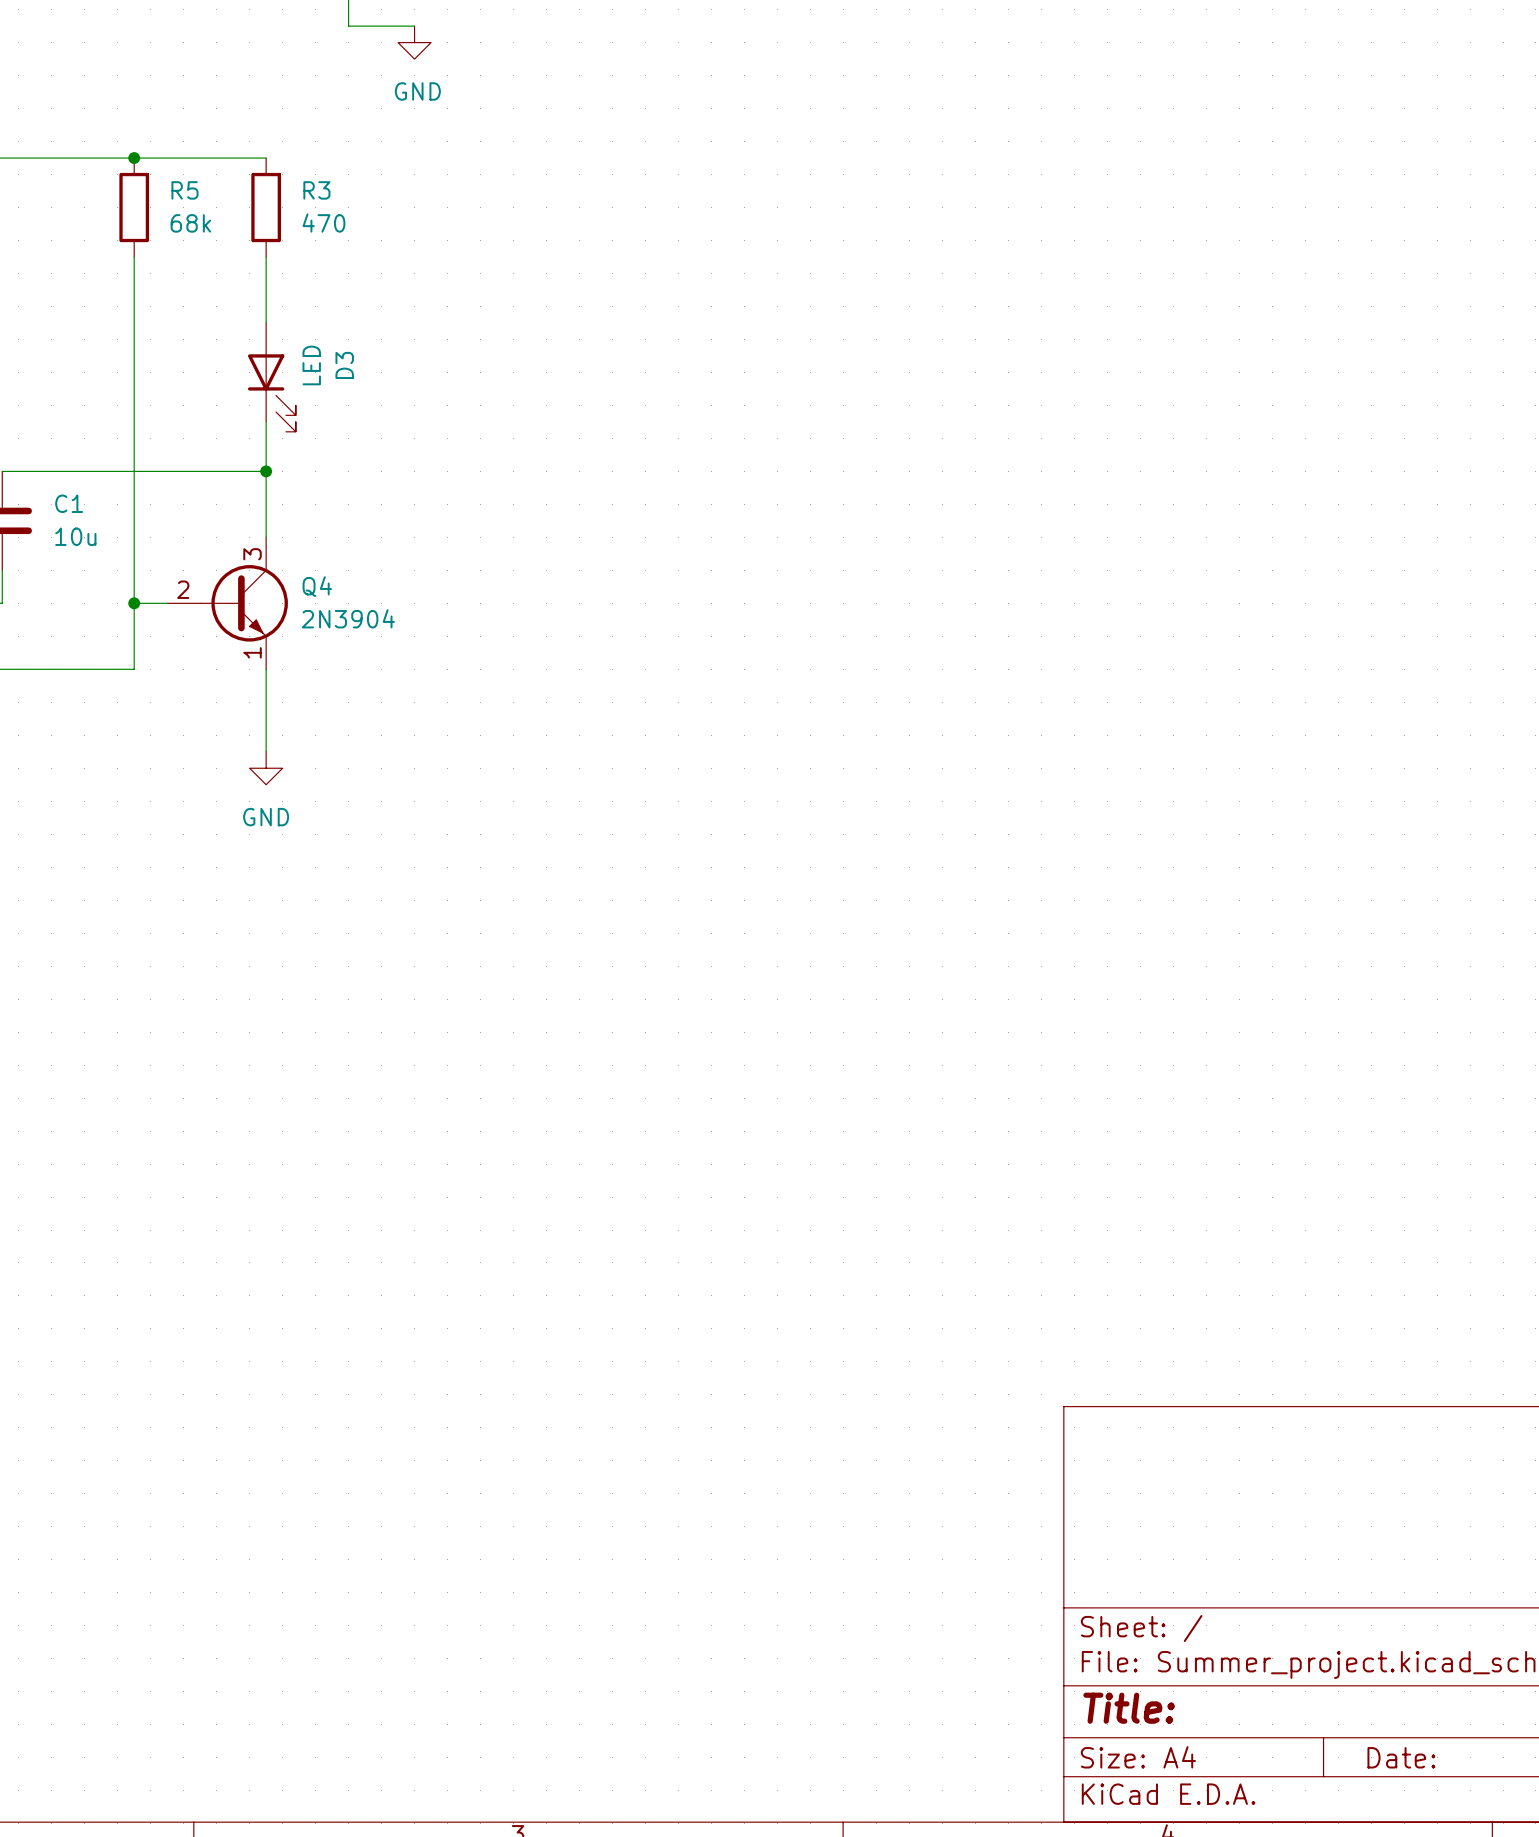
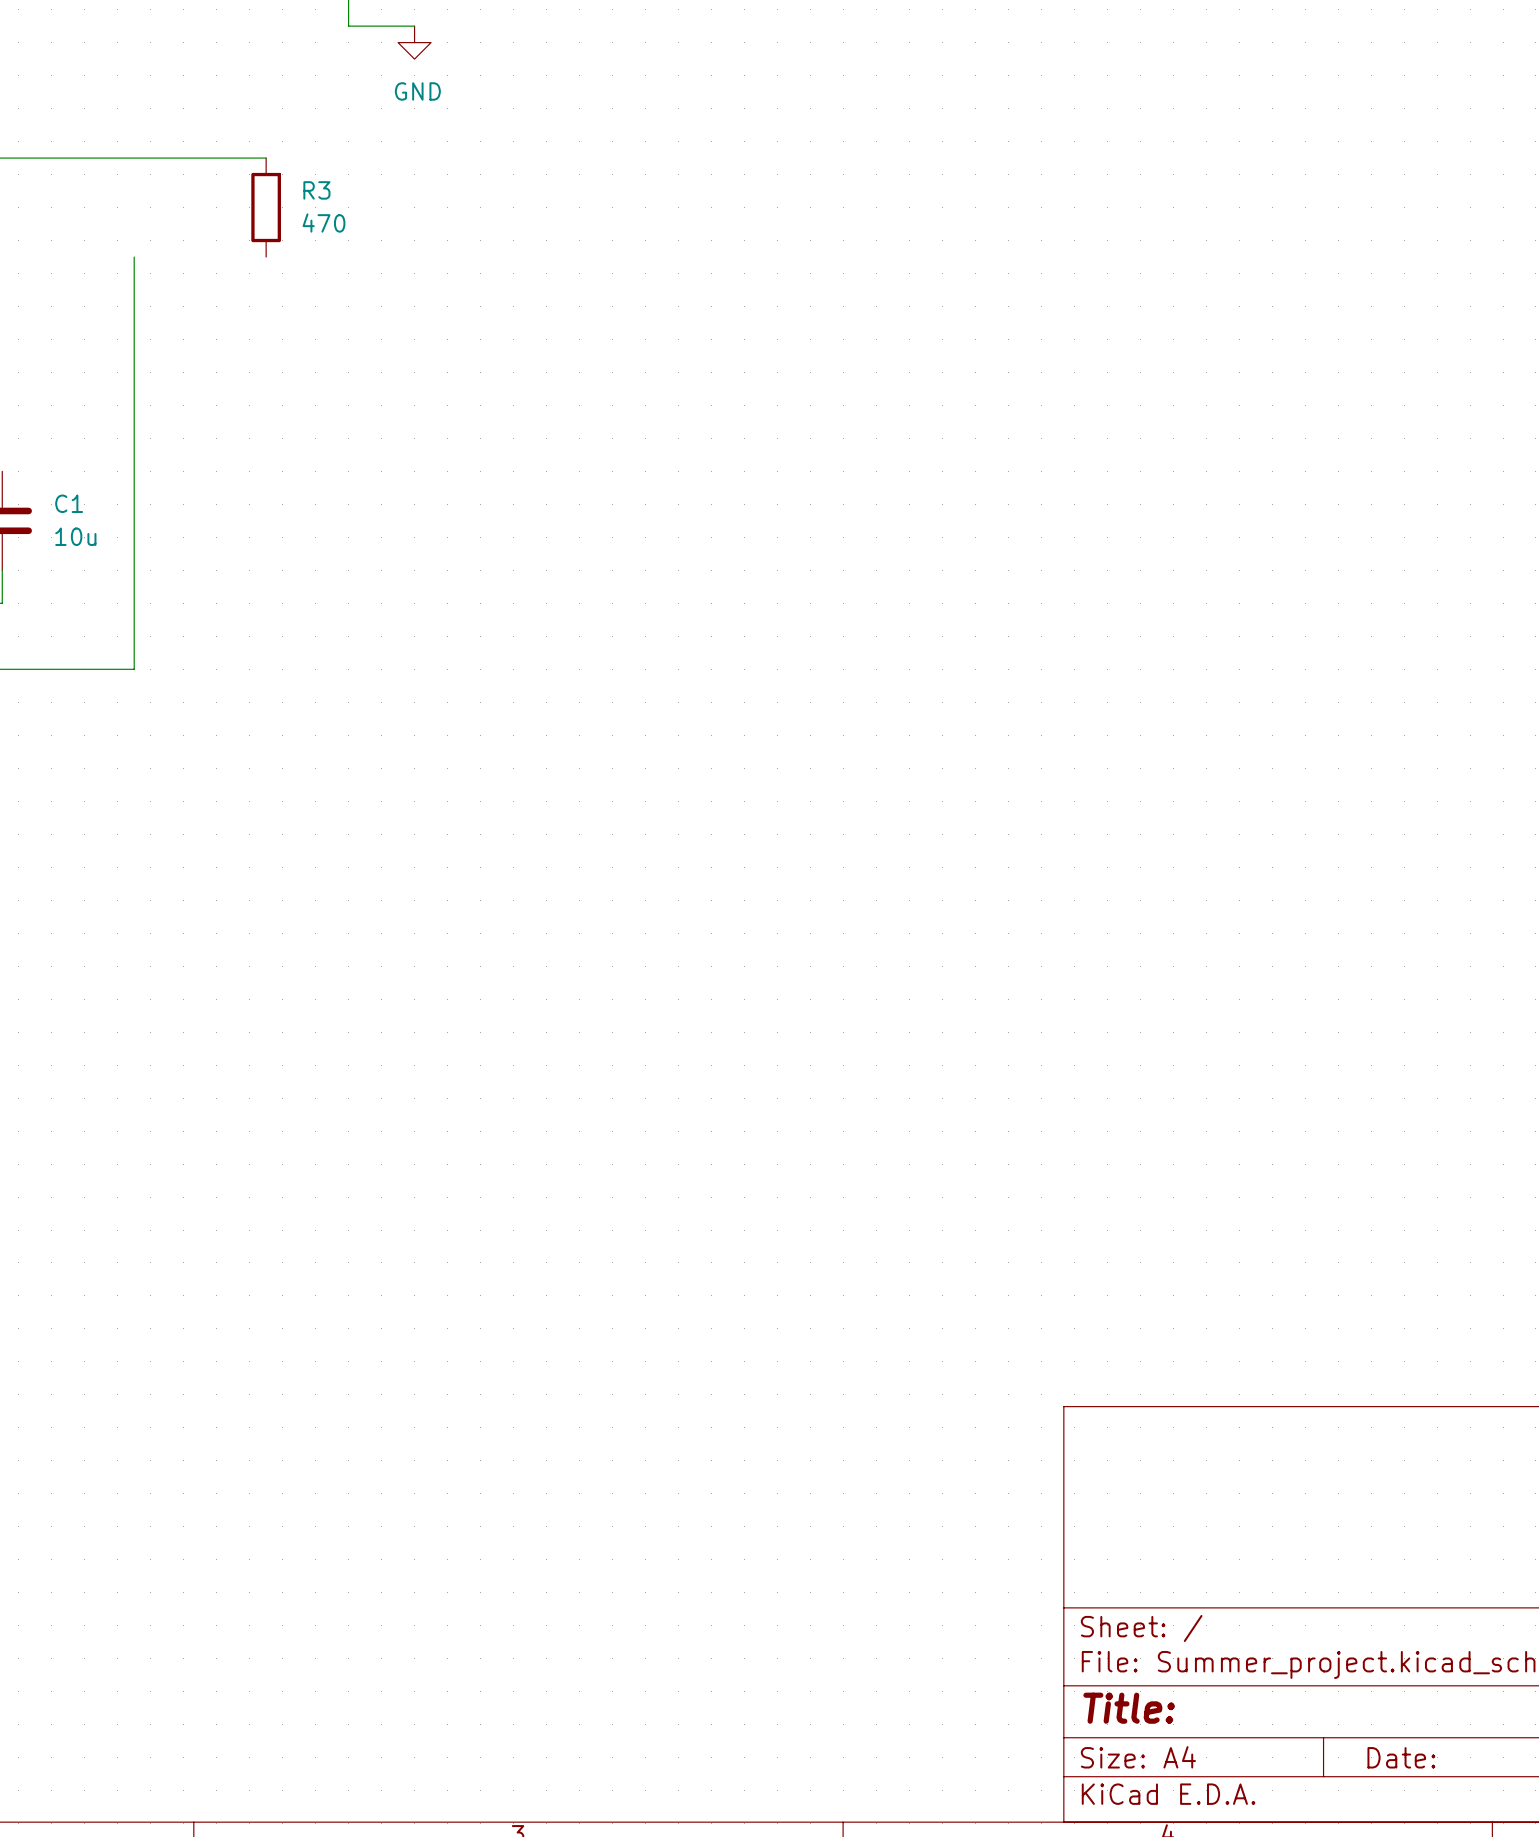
junction: (134, 158) -> none
R5: 68k (134, 207) -> none
wire: (266, 257) (266, 322) -> none
D3: LED (271, 377) -> none
wire: (266, 421) (266, 537) -> none
wire: (2, 471) (266, 471) -> none
junction: (266, 471) -> none
wire: (134, 603) (167, 603) -> none
junction: (134, 603) -> none
Q4: 2N3904 (227, 603) -> none
wire: (266, 669) (266, 751) -> none
power symbol: GND (266, 768) -> none

